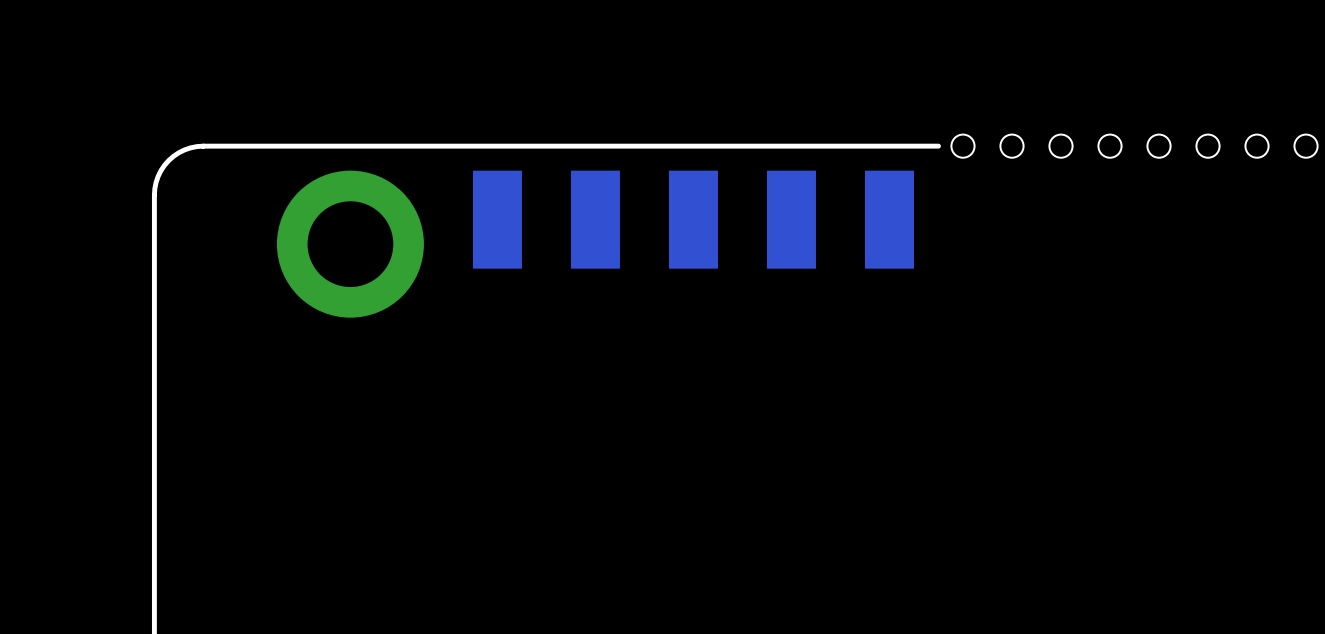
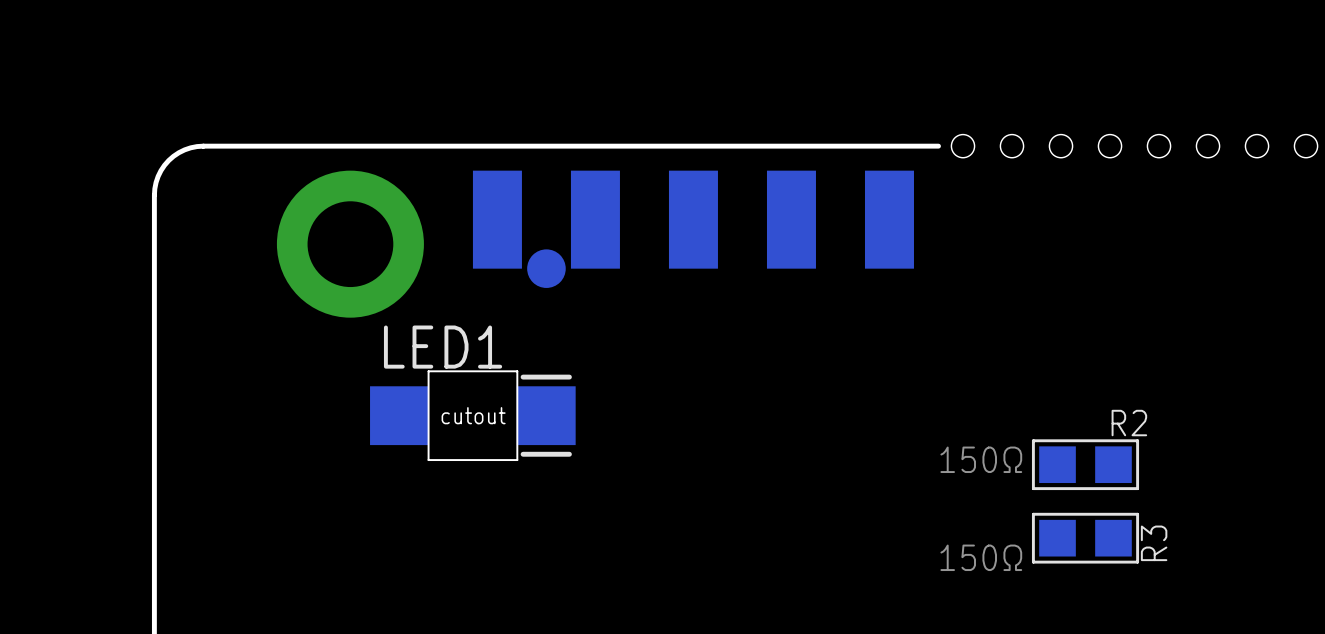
part: none -> (546, 268)
LED1: none -> (472, 415)
R2: none -> 150Ω (1085, 464)
R3: none -> 150Ω (1085, 538)

